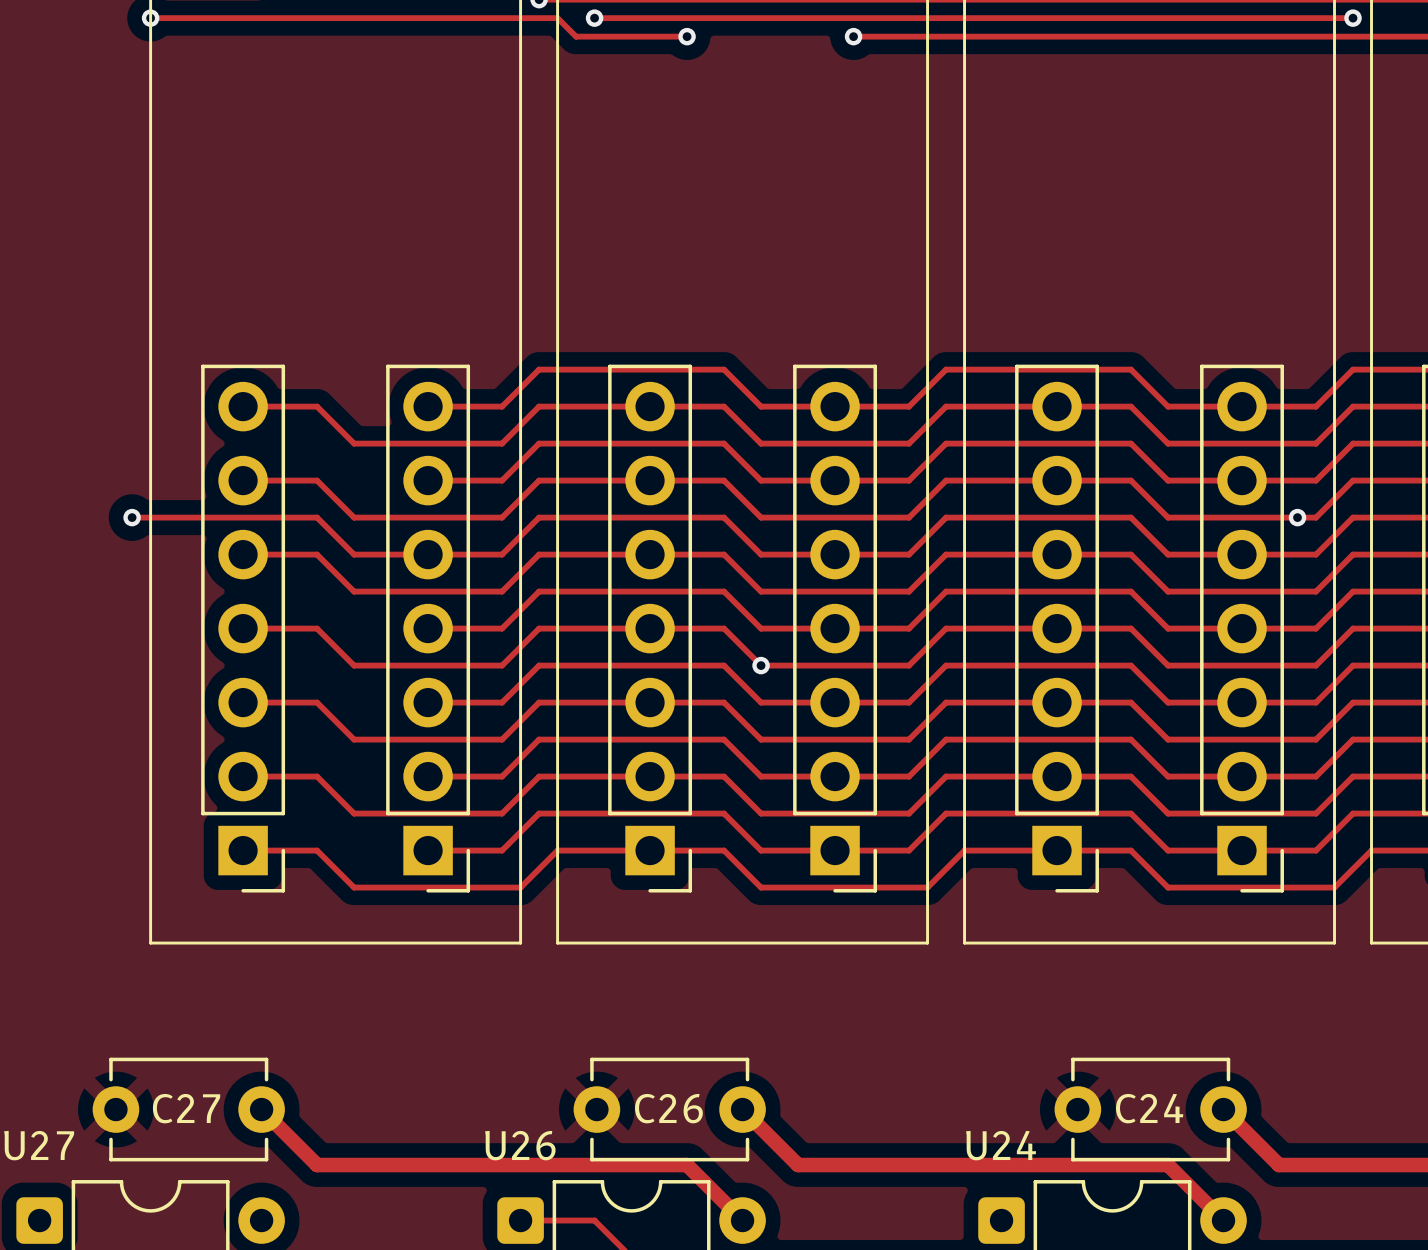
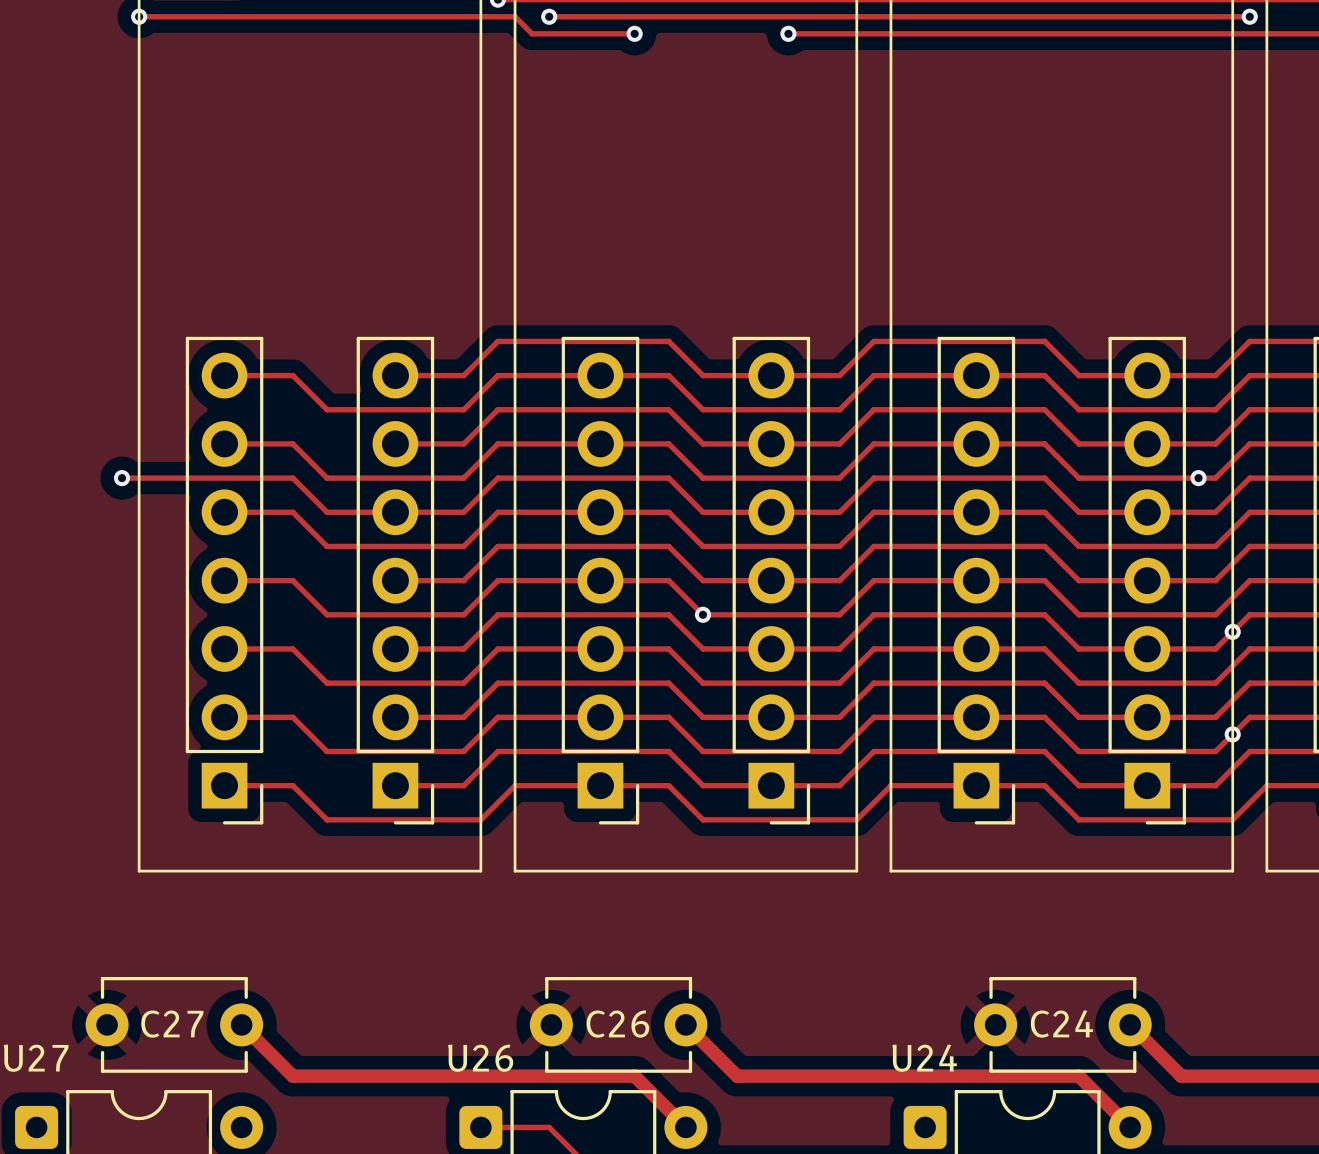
via: none -> (1232, 631)
via: none -> (1232, 734)

